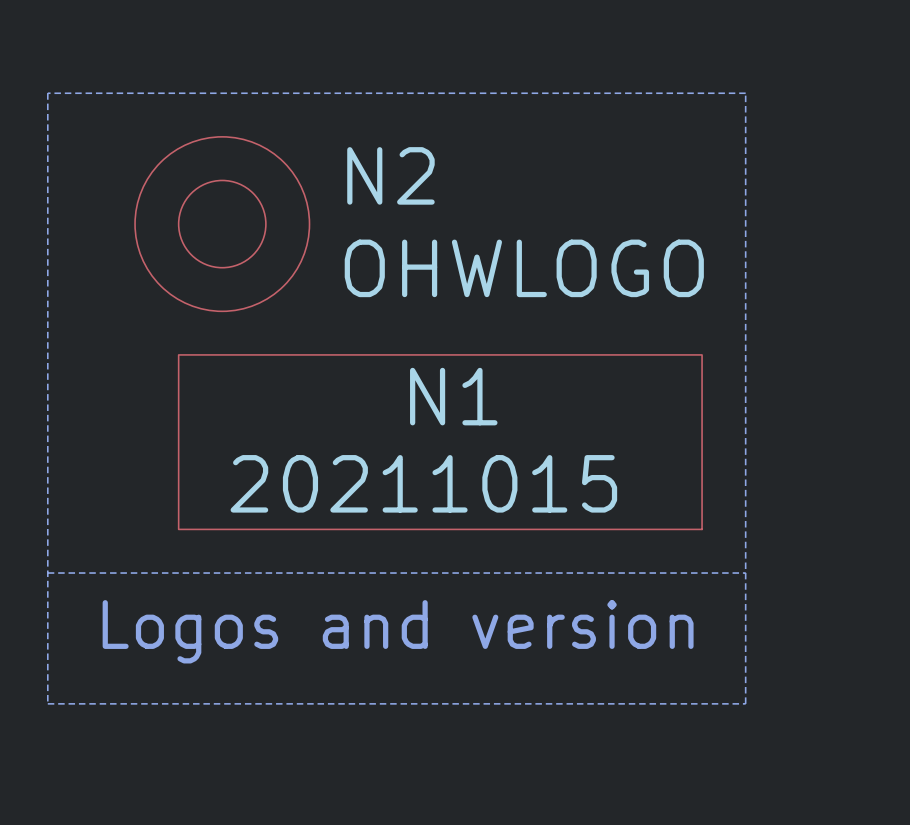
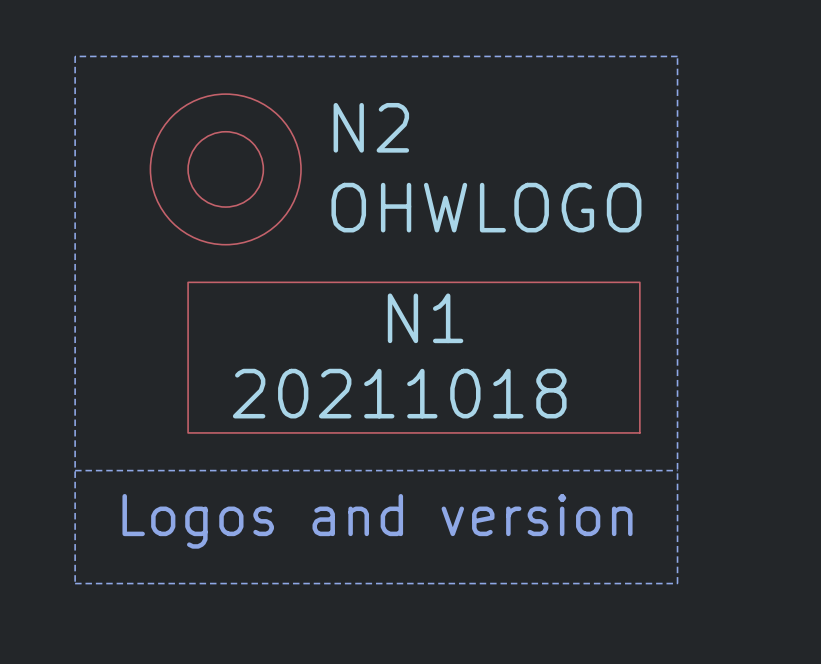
N1 value: 20211015 (423, 483) -> 20211018 (399, 393)

